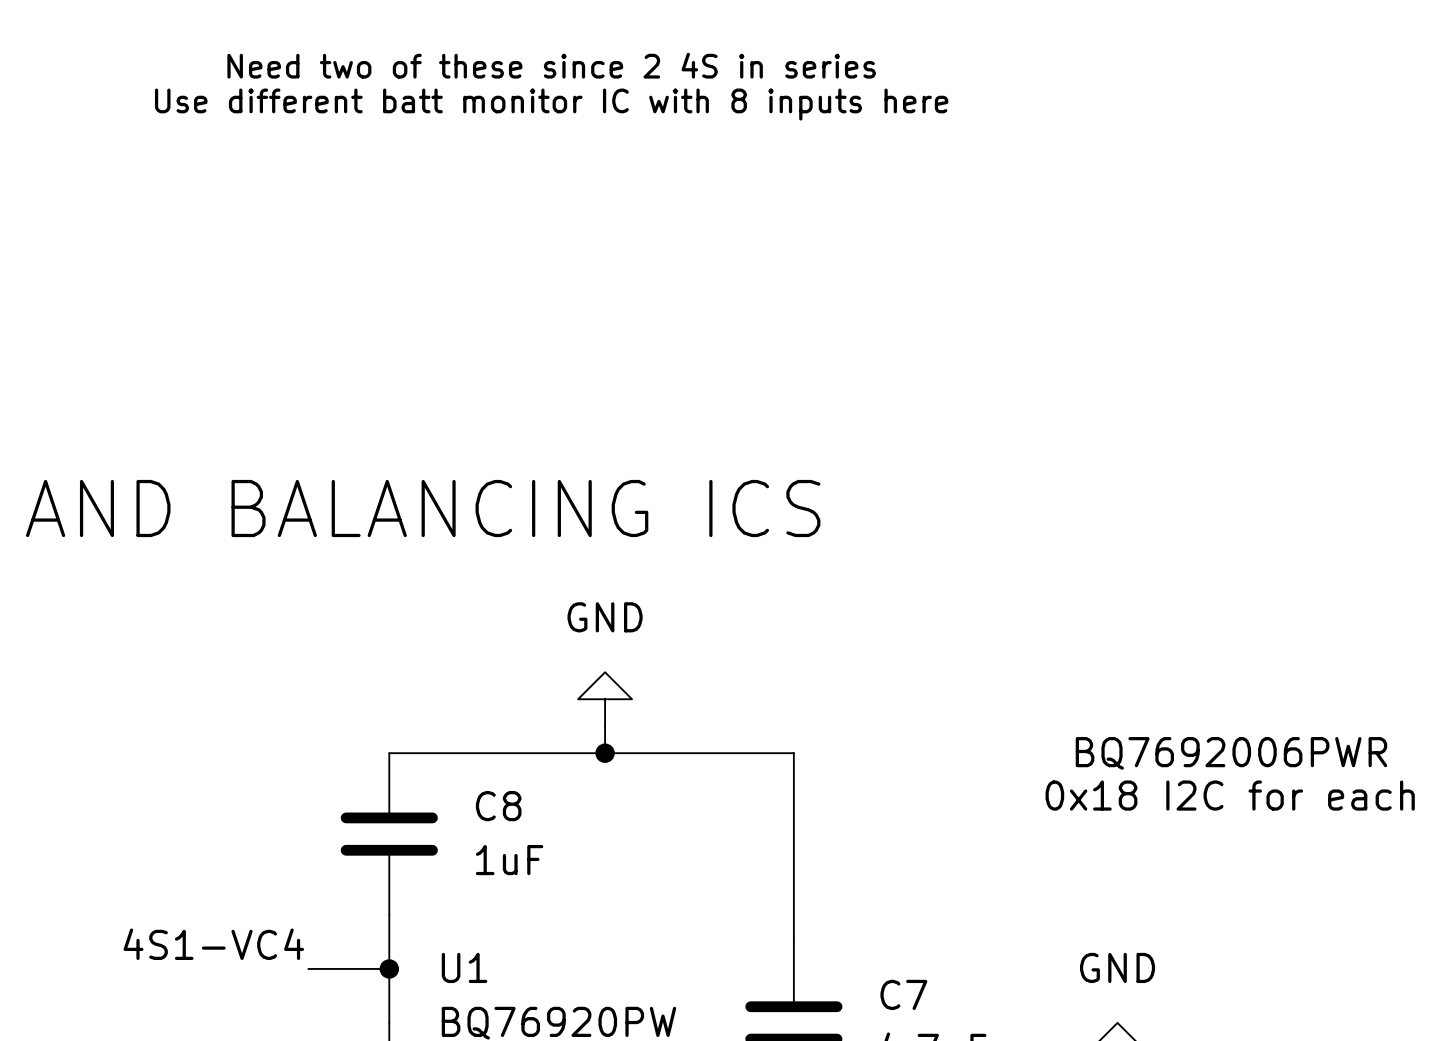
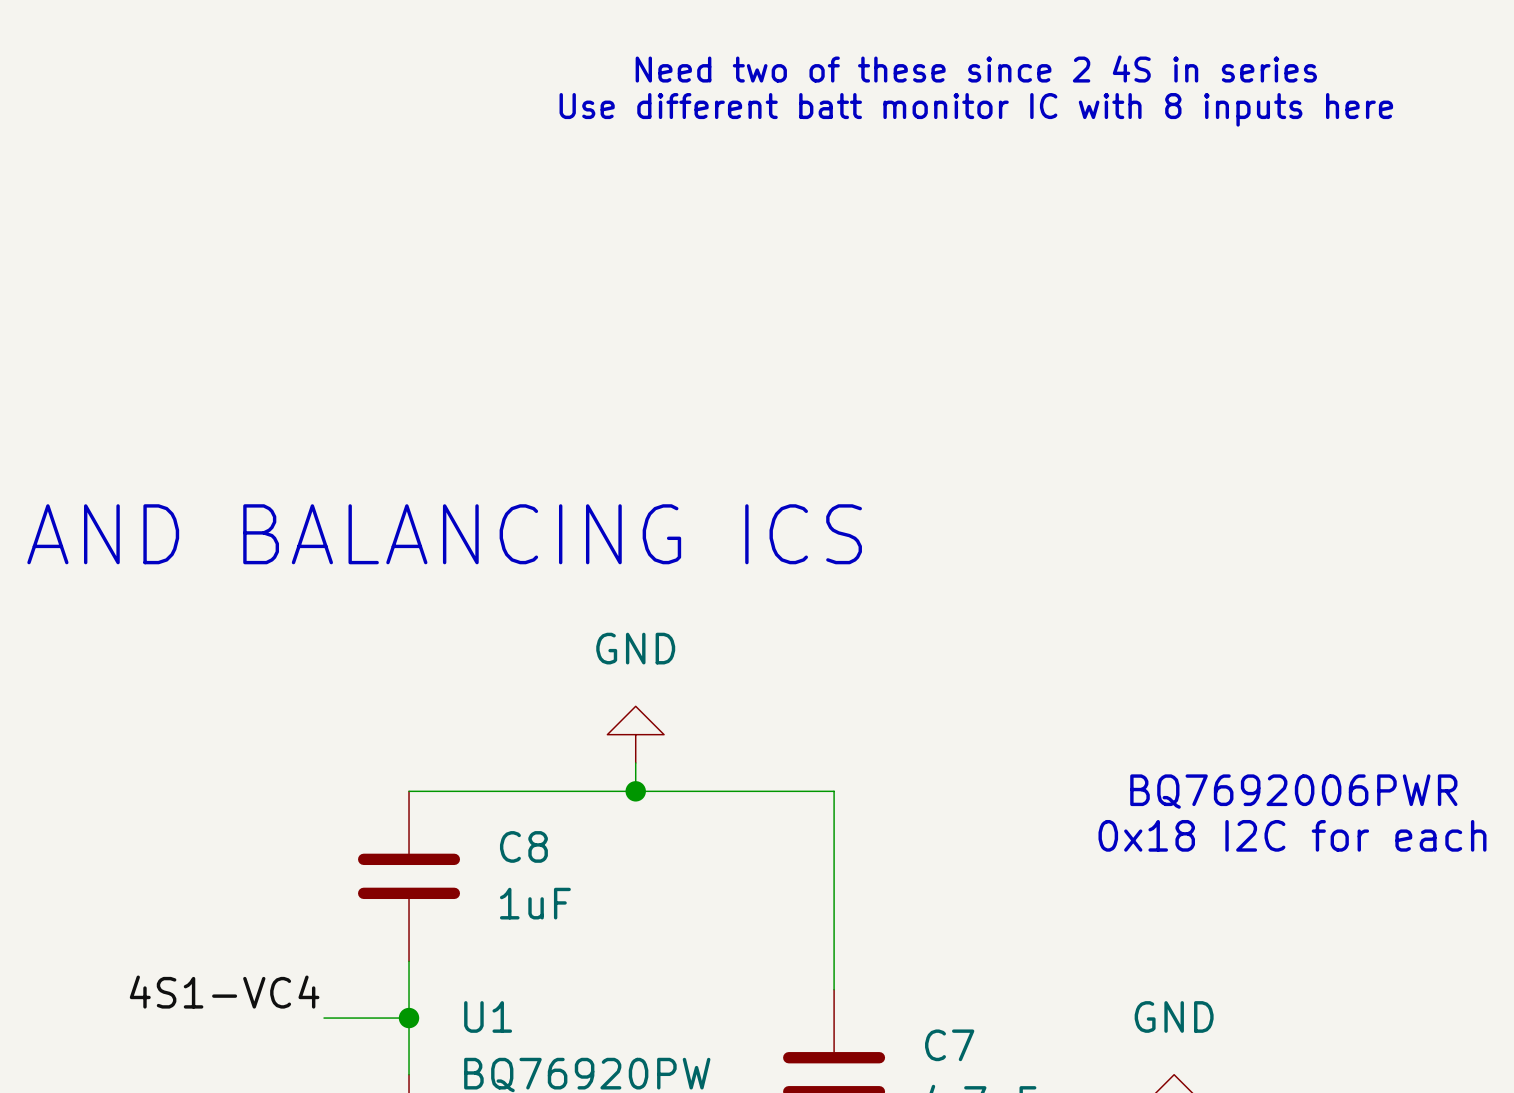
text position: Need two of these since 2 4S in series (551, 65) -> Need two of these since 2 4S in series (976, 69)
text position: Use different batt monitor IC with 8 inputs here (551, 104) -> Use different batt monitor IC with 8 inputs here (976, 109)

